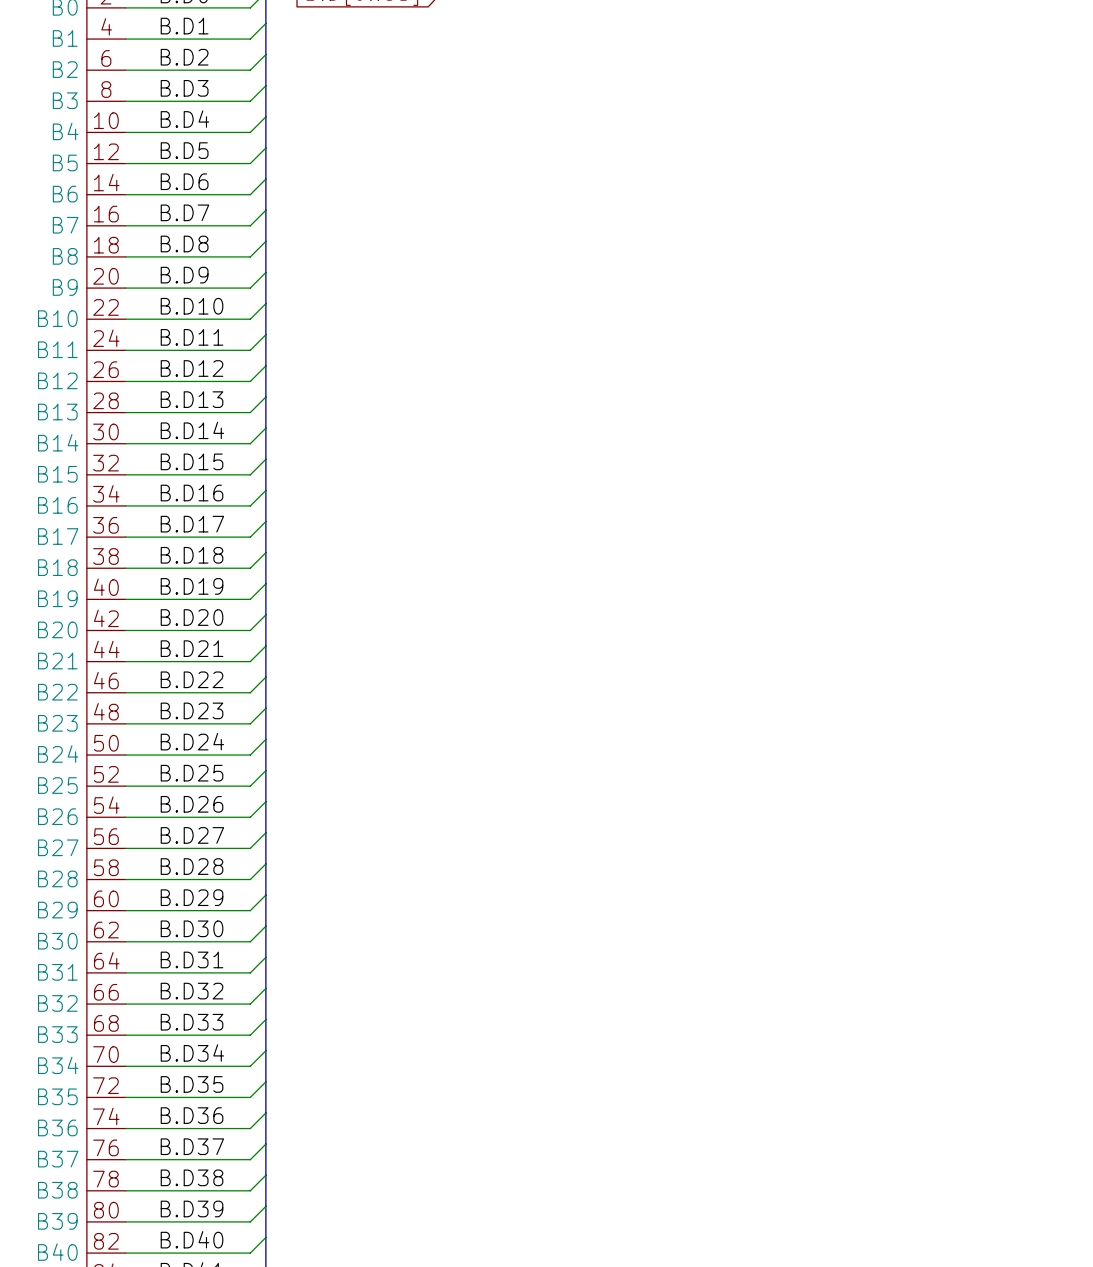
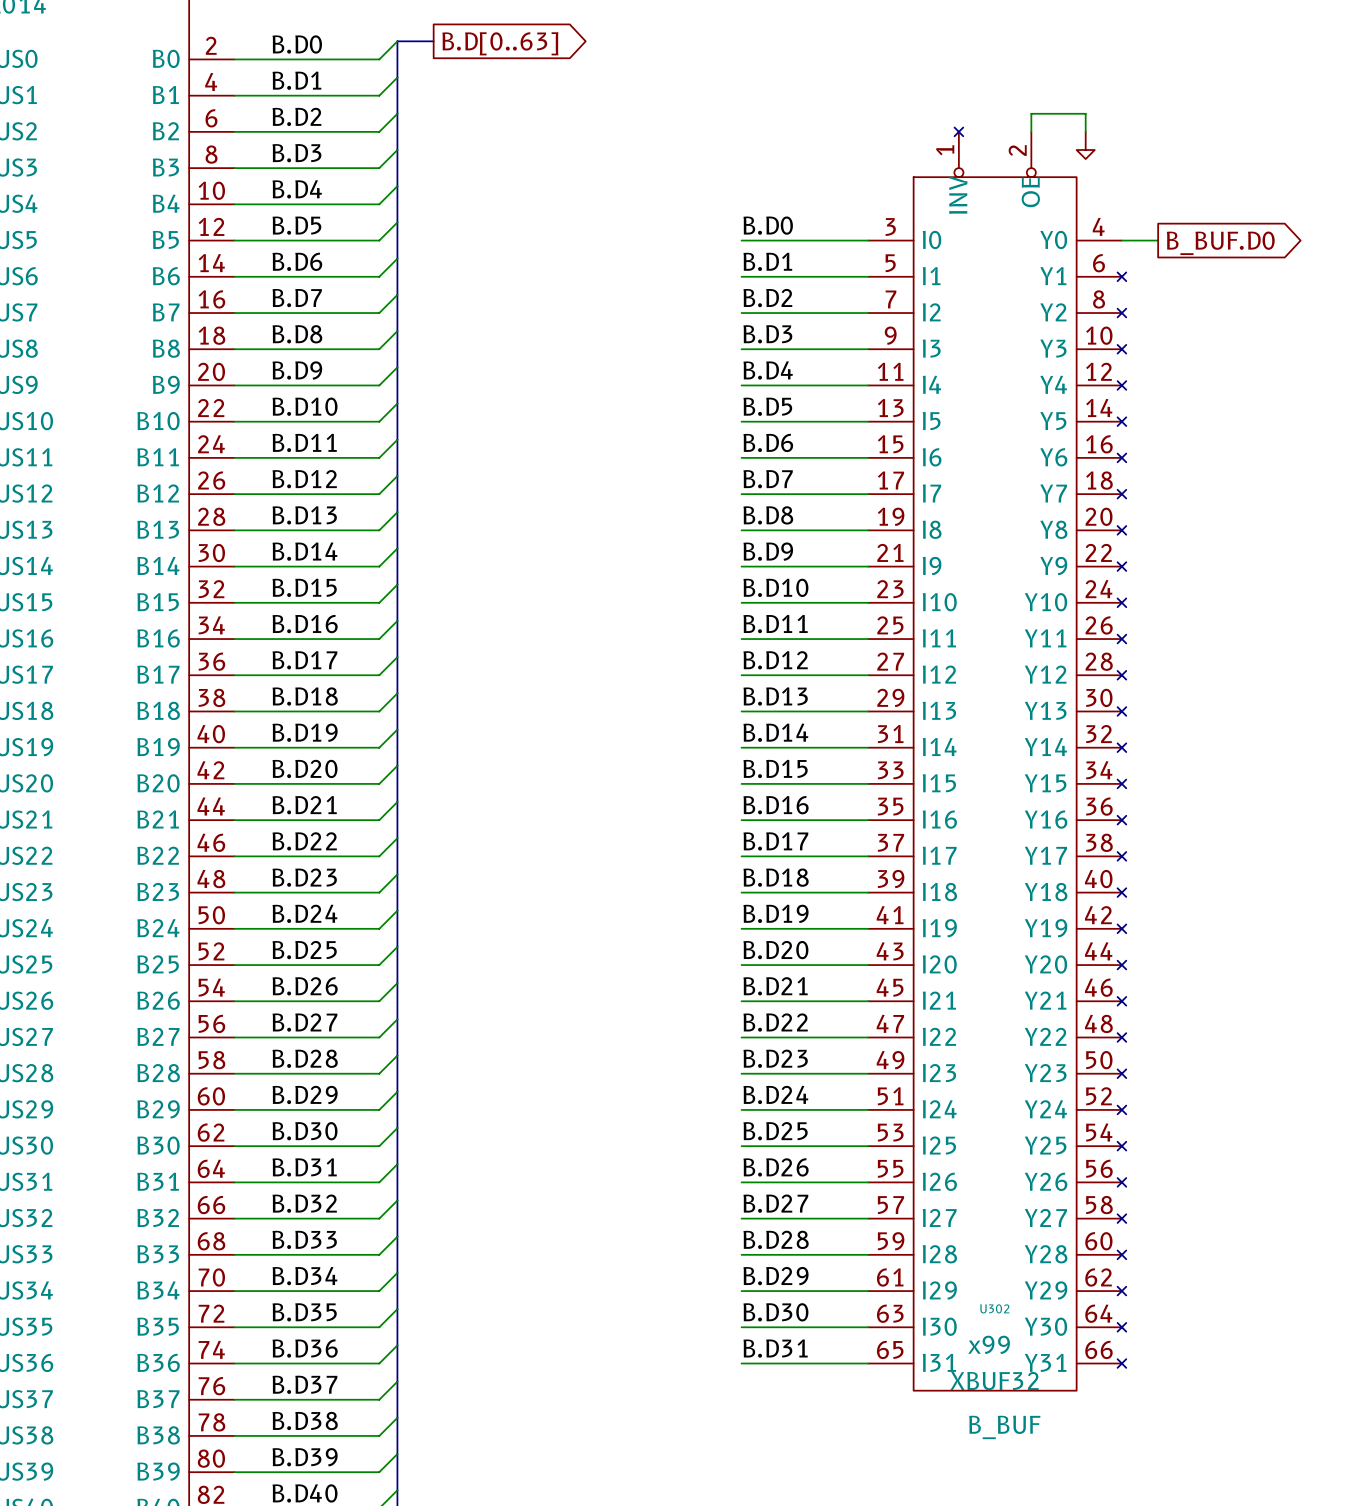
no-connect mark: none -> (958, 131)
wire: none -> (1031, 131) (1031, 113) (1085, 113) (1085, 131)
power symbol: none -> (1085, 145)
label: none -> B.D0 (768, 225)
wire: none -> (741, 240) (868, 240)
wire: none -> (1121, 240) (1158, 240)
global label: none -> B_BUF.D0 (1220, 243)
label: none -> B.D1 (767, 261)
wire: none -> (741, 276) (868, 276)
no-connect mark: none -> (1121, 276)
label: none -> B.D2 (767, 298)
wire: none -> (741, 313) (868, 313)
no-connect mark: none -> (1121, 313)
label: none -> B.D3 (767, 334)
wire: none -> (741, 349) (868, 349)
no-connect mark: none -> (1121, 349)
label: none -> B.D4 (768, 370)
wire: none -> (741, 385) (868, 385)
no-connect mark: none -> (1121, 385)
label: none -> B.D5 (767, 406)
wire: none -> (741, 421) (868, 421)
no-connect mark: none -> (1121, 421)
label: none -> B.D6 (768, 442)
wire: none -> (741, 457) (868, 457)
no-connect mark: none -> (1121, 457)
label: none -> B.D7 (768, 479)
wire: none -> (741, 494) (868, 494)
no-connect mark: none -> (1121, 494)
label: none -> B.D8 (768, 515)
wire: none -> (741, 530) (868, 530)
no-connect mark: none -> (1121, 530)
label: none -> B.D9 (768, 551)
wire: none -> (741, 566) (868, 566)
no-connect mark: none -> (1121, 566)
label: none -> B.D10 (775, 587)
wire: none -> (741, 602) (868, 602)
no-connect mark: none -> (1121, 602)
label: none -> B.D11 (775, 624)
wire: none -> (741, 639) (868, 639)
no-connect mark: none -> (1121, 639)
label: none -> B.D12 (775, 660)
wire: none -> (741, 675) (868, 675)
no-connect mark: none -> (1121, 675)
label: none -> B.D13 (775, 696)
wire: none -> (741, 711) (868, 711)
no-connect mark: none -> (1121, 711)
label: none -> B.D14 (775, 732)
wire: none -> (741, 747) (868, 747)
no-connect mark: none -> (1121, 747)
U302: none -> XBUF32 (995, 761)
label: none -> B.D15 (775, 768)
wire: none -> (741, 783) (868, 783)
no-connect mark: none -> (1121, 783)
label: none -> B.D16 (776, 805)
wire: none -> (741, 820) (868, 820)
no-connect mark: none -> (1121, 820)
label: none -> B.D17 (775, 841)
wire: none -> (741, 856) (868, 856)
no-connect mark: none -> (1121, 856)
label: none -> B.D18 (776, 877)
wire: none -> (741, 892) (868, 892)
no-connect mark: none -> (1121, 892)
label: none -> B.D19 (776, 913)
wire: none -> (741, 928) (868, 928)
no-connect mark: none -> (1121, 928)
label: none -> B.D20 (775, 950)
wire: none -> (741, 965) (868, 965)
no-connect mark: none -> (1121, 965)
label: none -> B.D21 (775, 986)
wire: none -> (741, 1001) (868, 1001)
no-connect mark: none -> (1121, 1001)
label: none -> B.D22 (775, 1022)
wire: none -> (741, 1037) (868, 1037)
no-connect mark: none -> (1121, 1037)
label: none -> B.D23 (775, 1058)
wire: none -> (741, 1073) (868, 1073)
no-connect mark: none -> (1121, 1073)
label: none -> B.D24 (775, 1094)
wire: none -> (741, 1109) (868, 1109)
no-connect mark: none -> (1121, 1109)
label: none -> B.D25 (775, 1131)
wire: none -> (741, 1146) (868, 1146)
no-connect mark: none -> (1121, 1146)
label: none -> B.D26 (776, 1167)
wire: none -> (741, 1182) (868, 1182)
no-connect mark: none -> (1121, 1182)
label: none -> B.D27 (775, 1203)
wire: none -> (741, 1218) (868, 1218)
no-connect mark: none -> (1121, 1218)
label: none -> B.D28 (776, 1239)
wire: none -> (741, 1254) (868, 1254)
no-connect mark: none -> (1121, 1254)
label: none -> B.D29 (776, 1276)
wire: none -> (741, 1291) (868, 1291)
no-connect mark: none -> (1121, 1291)
label: none -> B.D30 (775, 1312)
wire: none -> (741, 1327) (868, 1327)
no-connect mark: none -> (1121, 1327)
label: none -> B.D31 (775, 1348)
wire: none -> (741, 1363) (868, 1363)
no-connect mark: none -> (1121, 1363)

